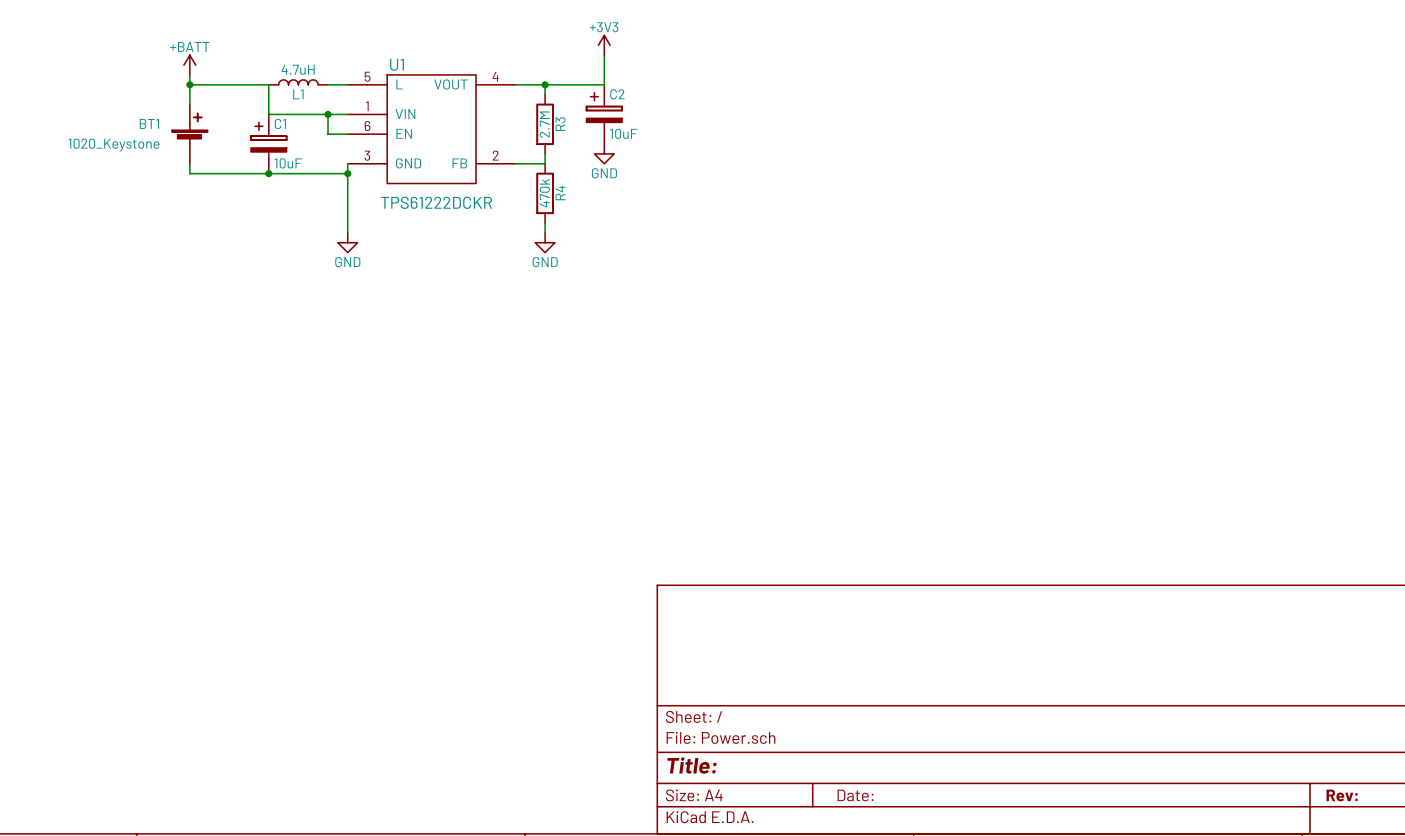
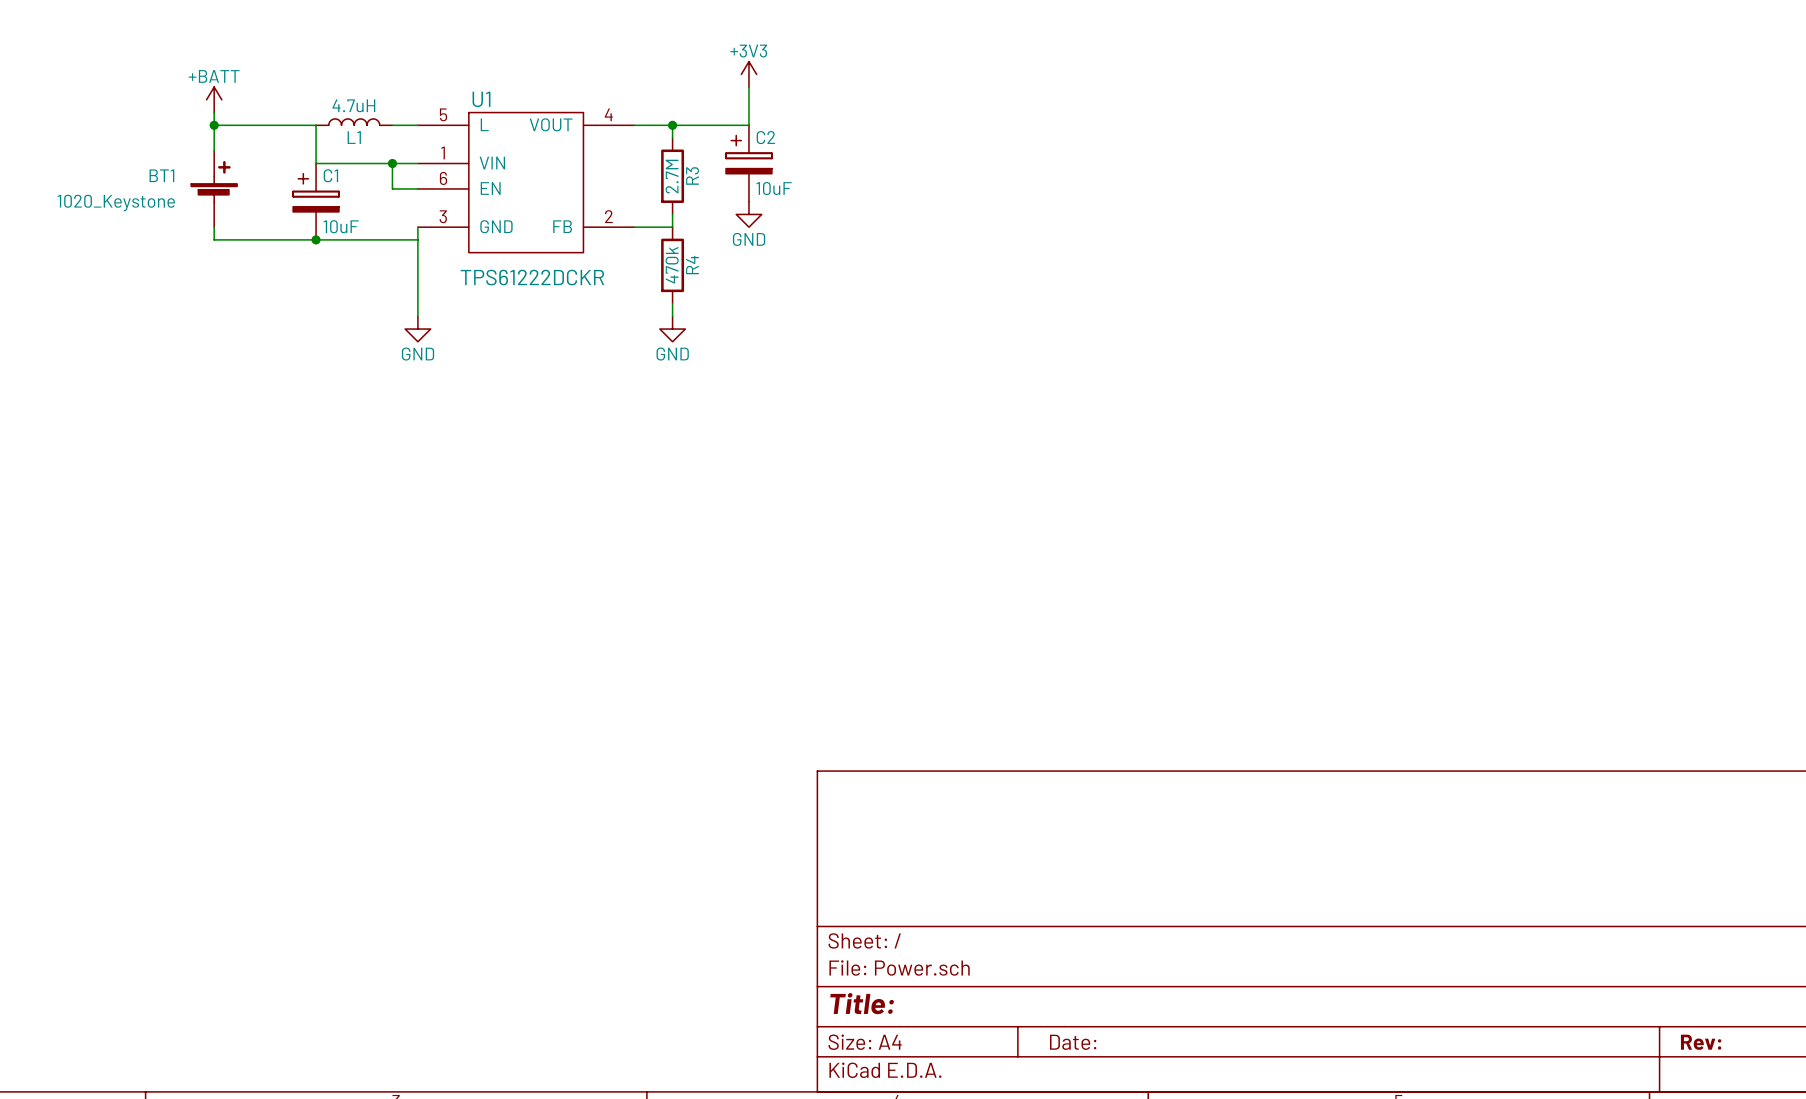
junction: (347, 173) -> none

